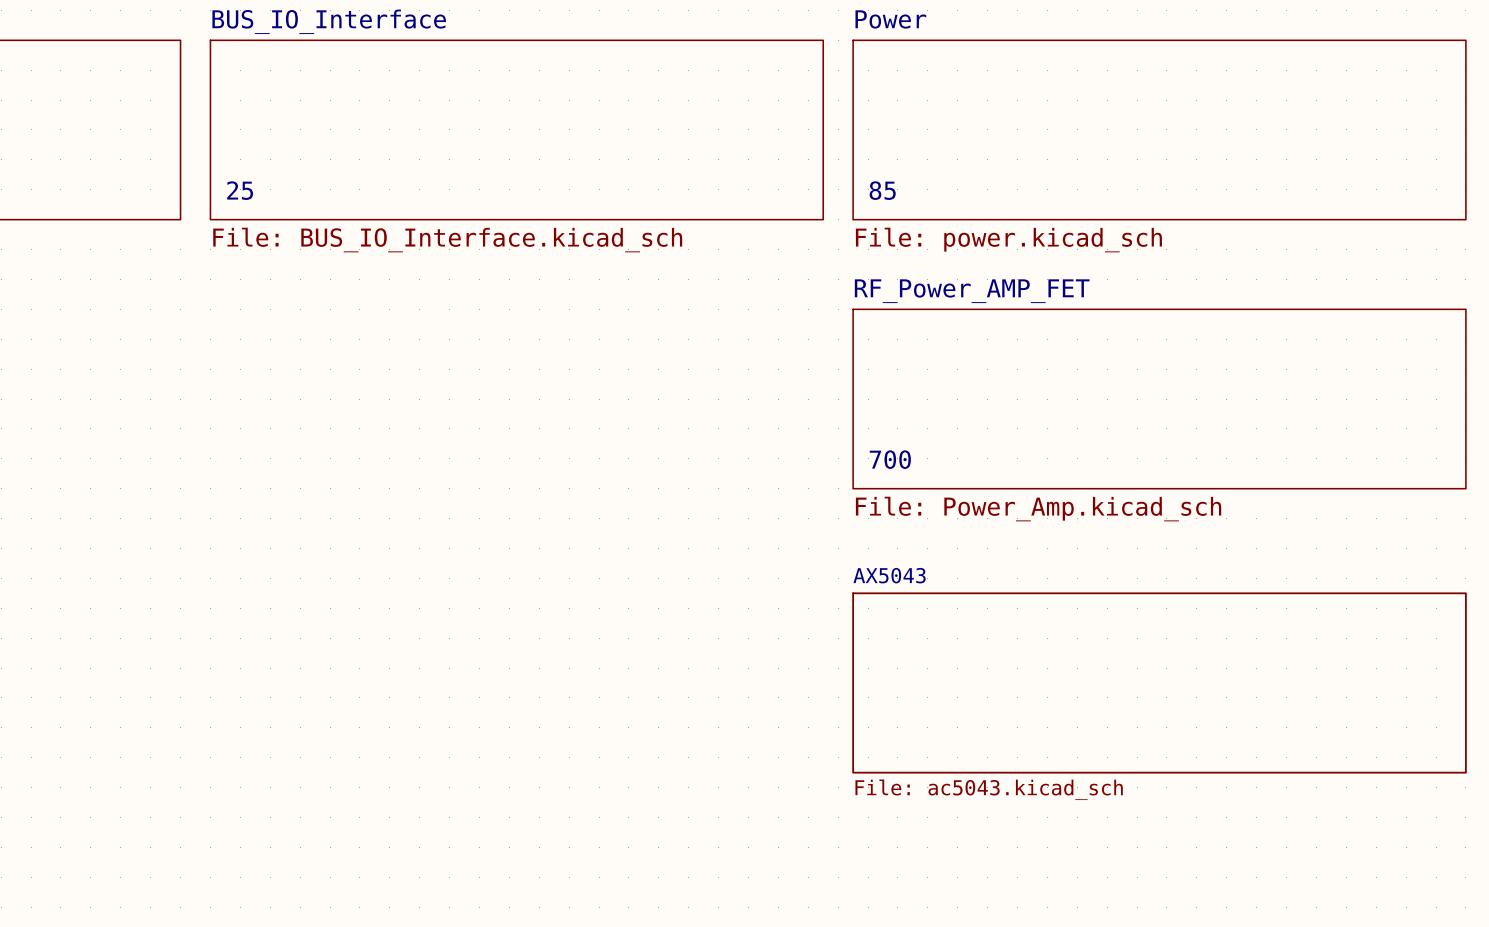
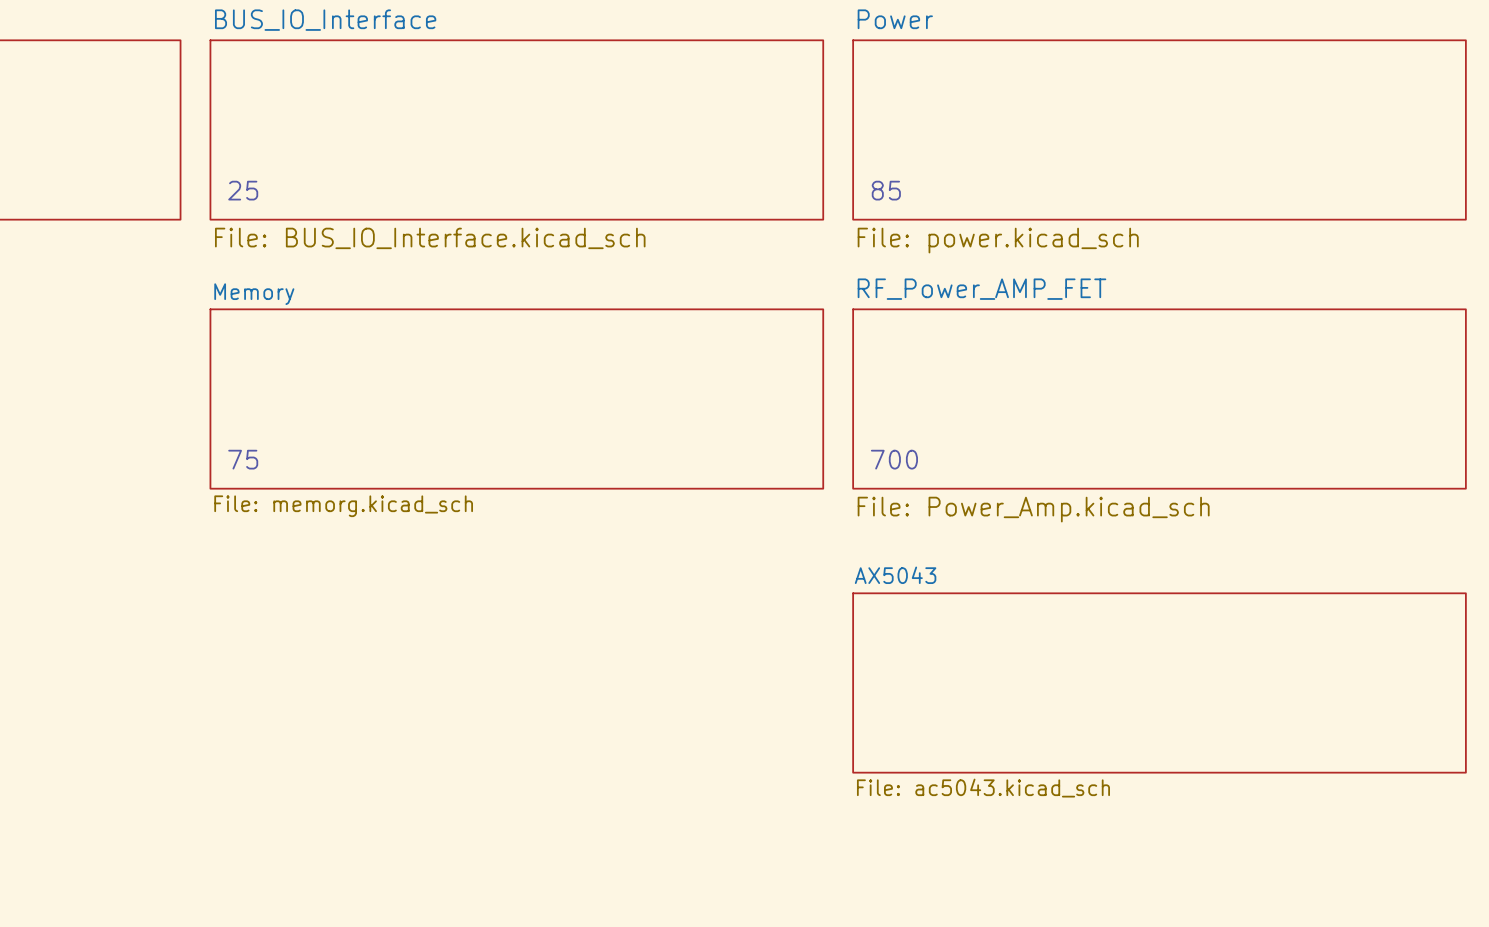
sheet Memory: none -> File: memorg.kicad_sch (516, 399)
text: none -> 75 (243, 459)

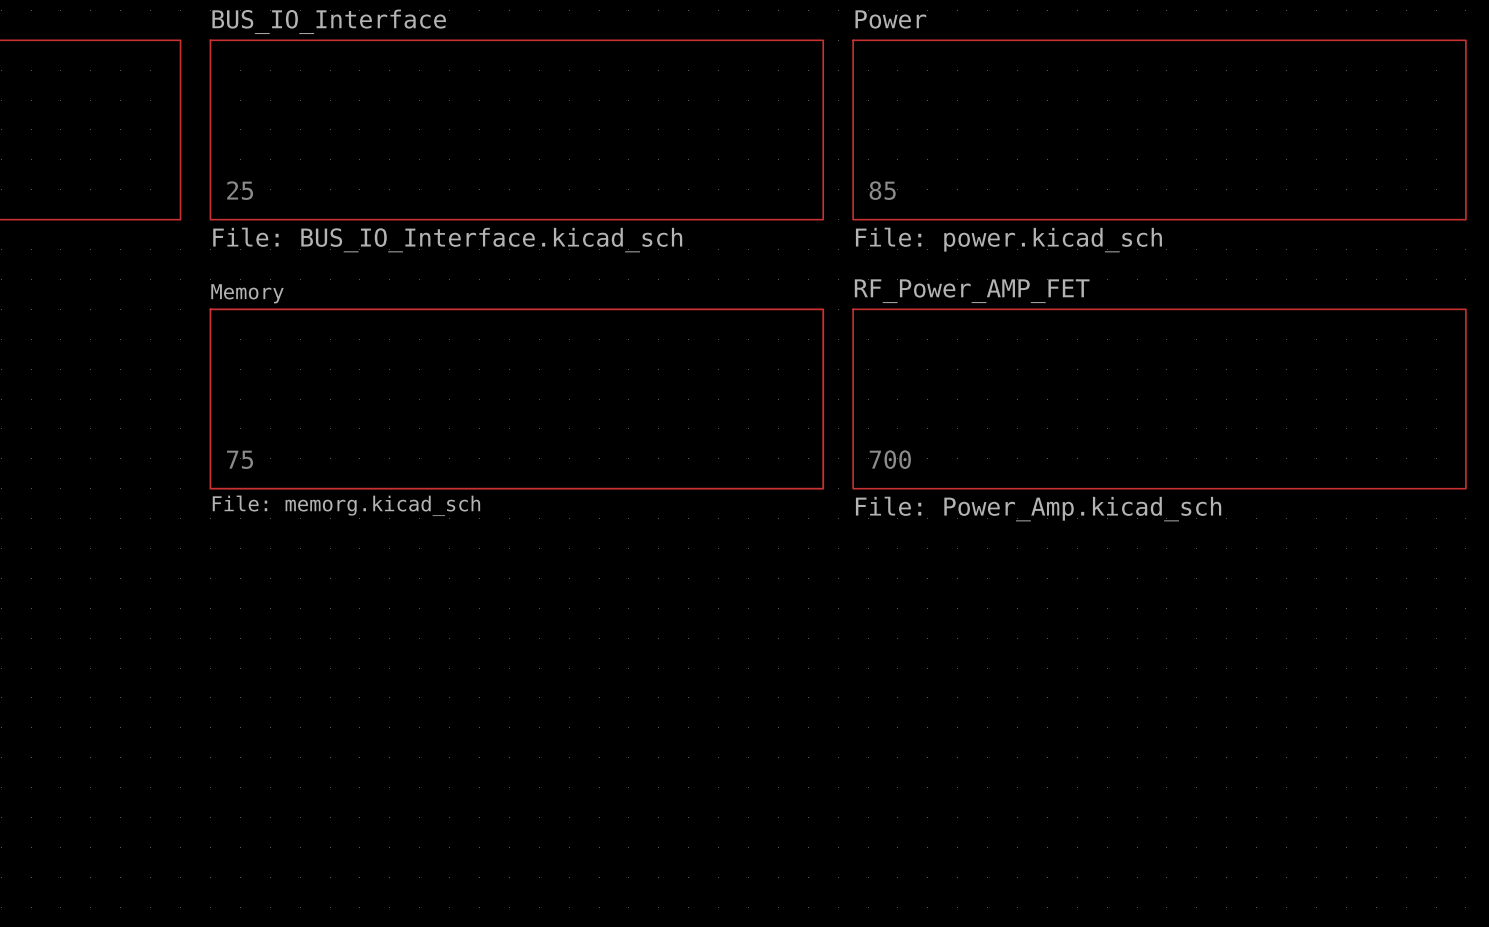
sheet AX5043: File: ac5043.kicad_sch (1159, 682) -> none

